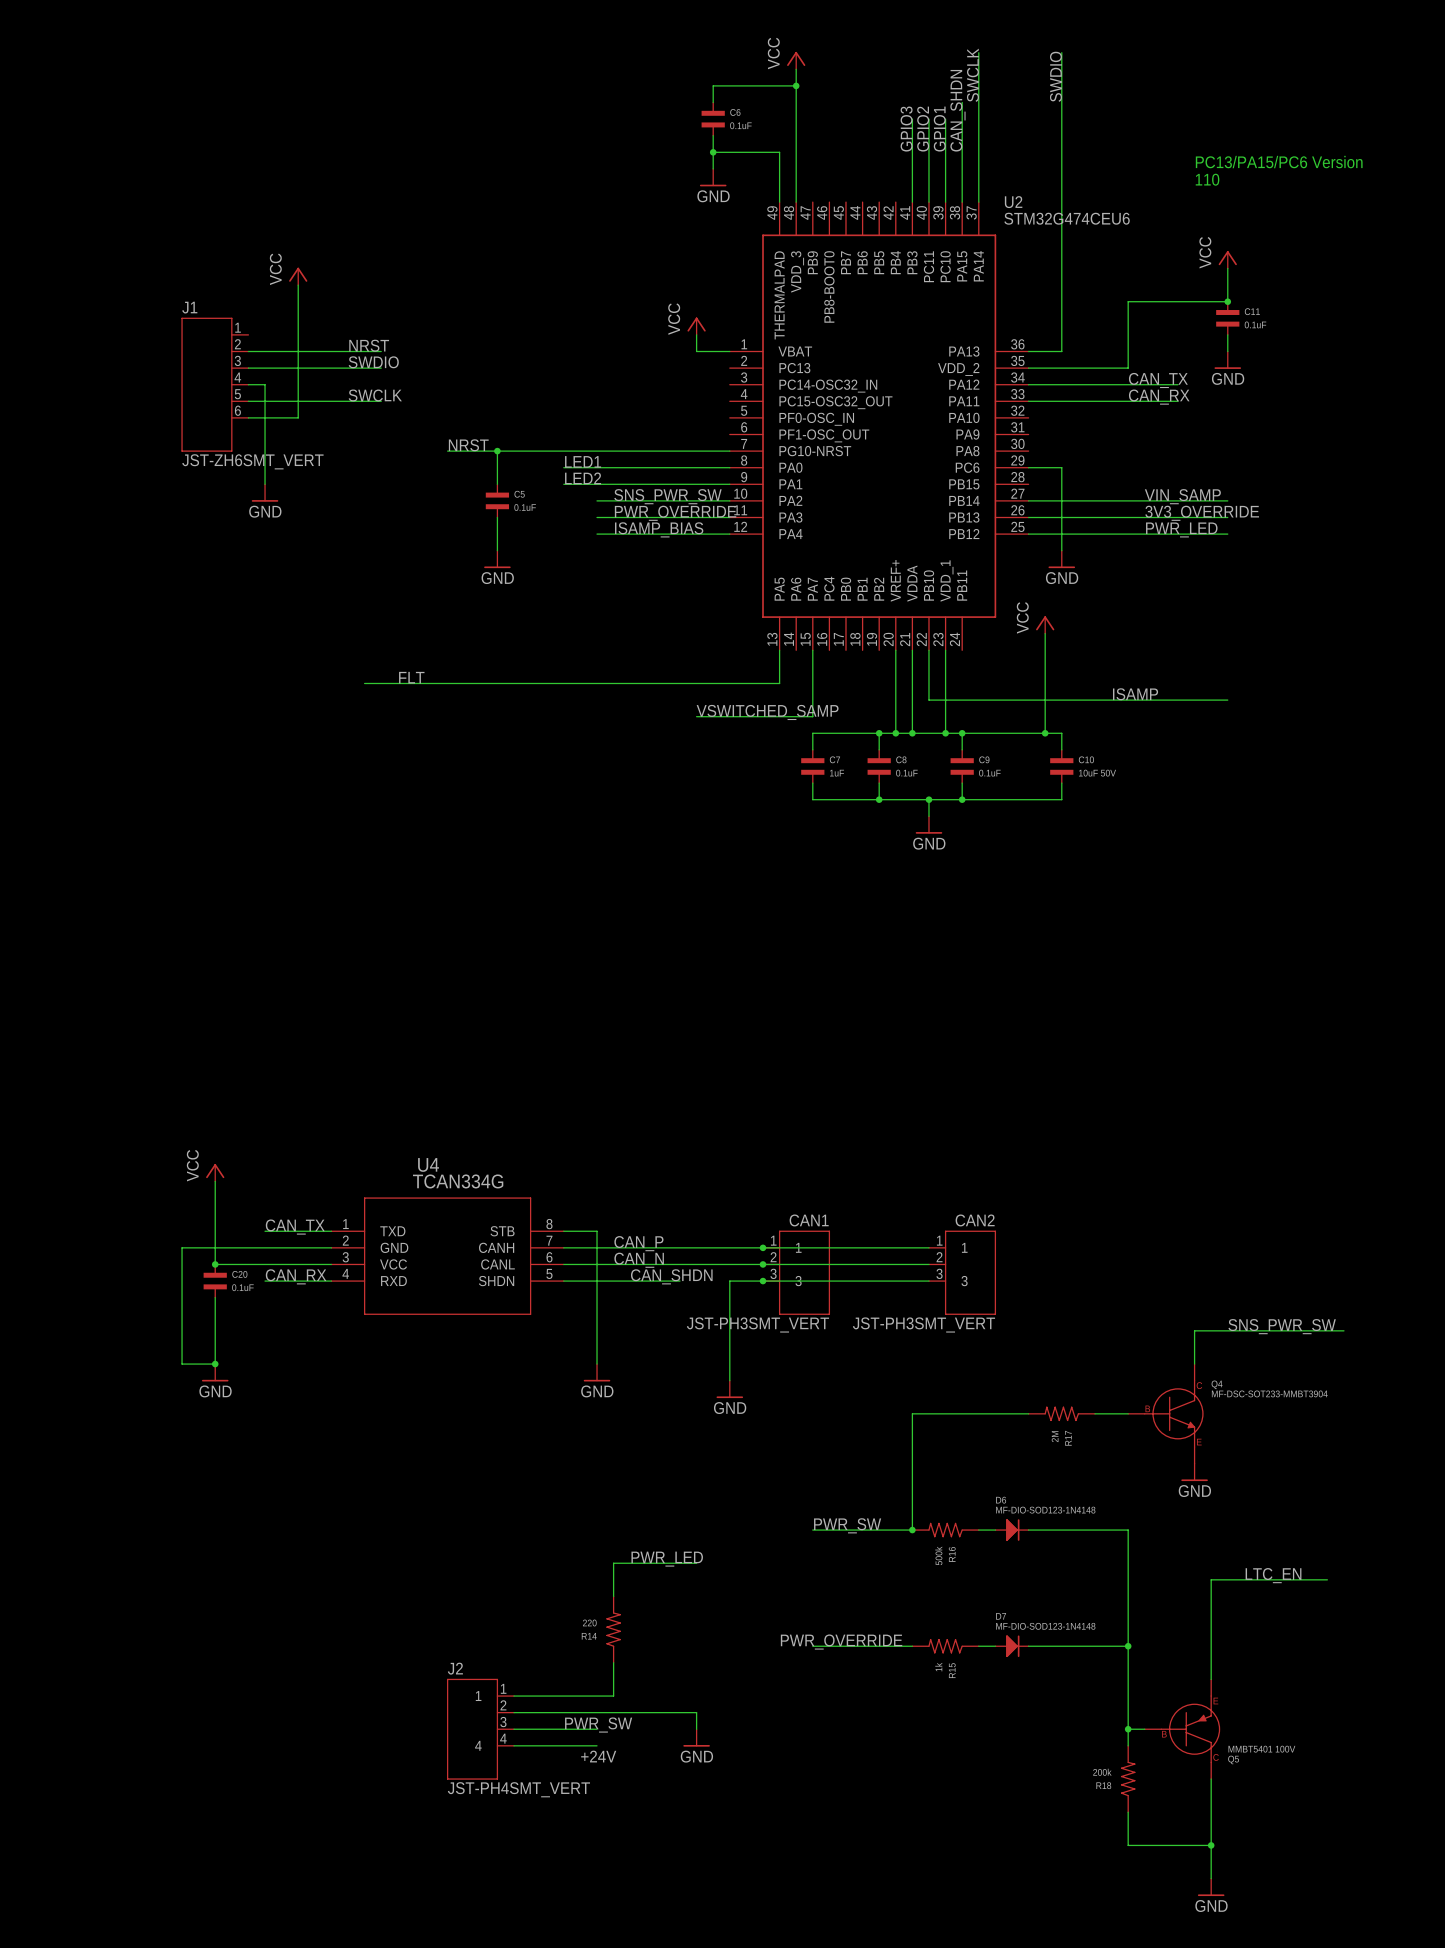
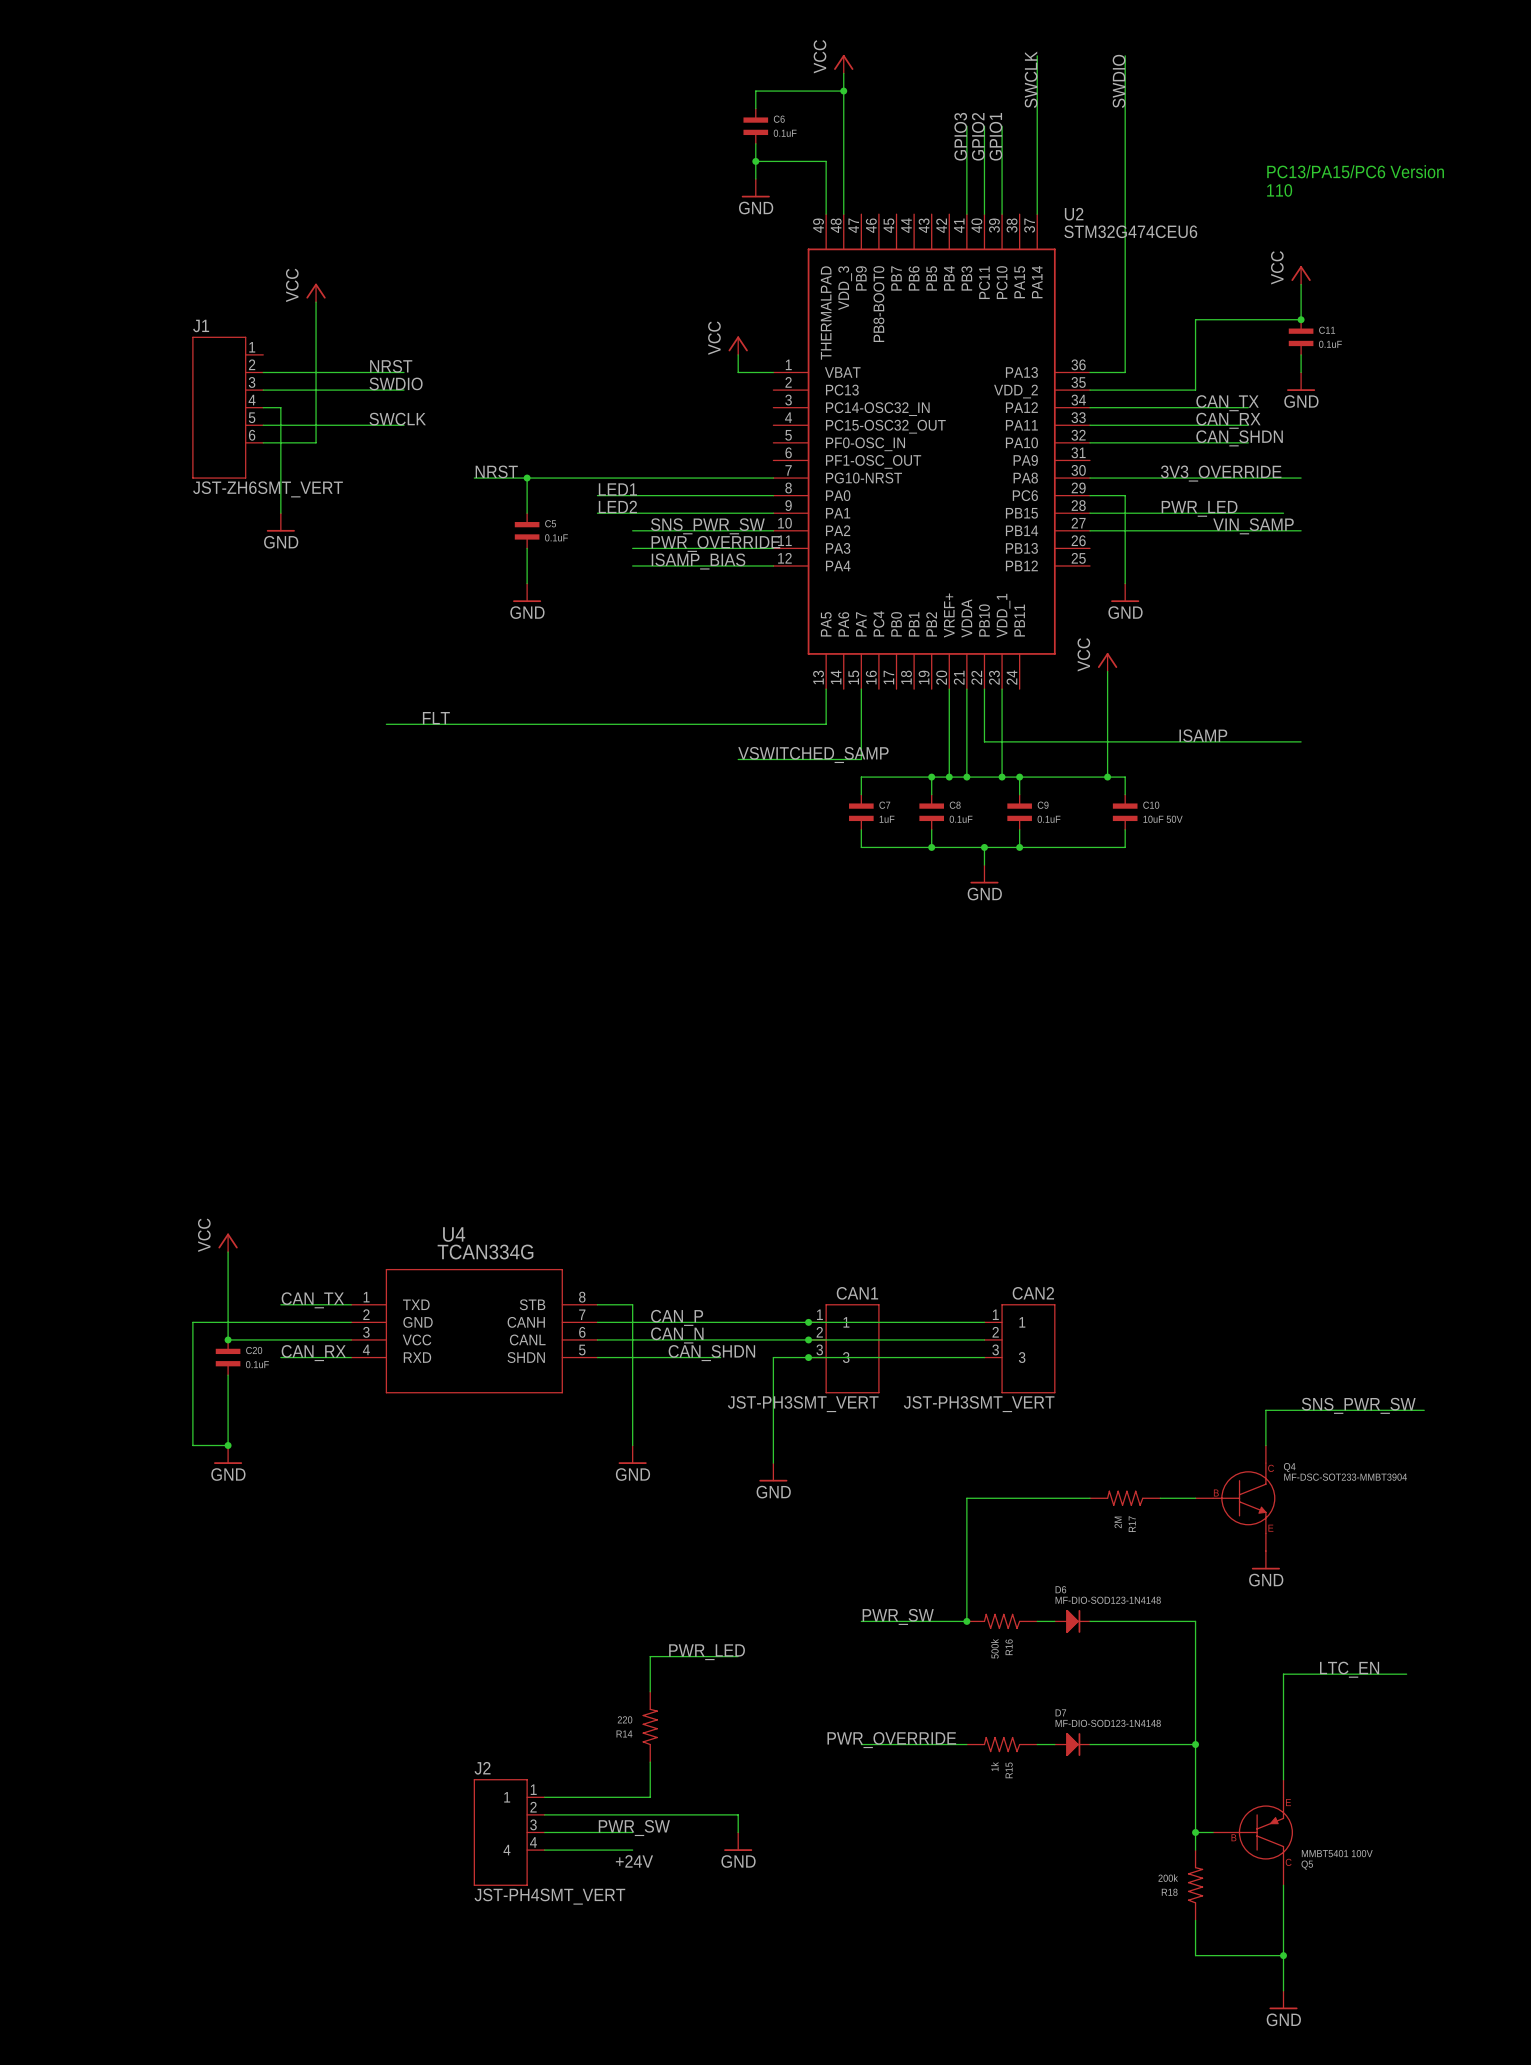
wire: (962, 102) (962, 202) -> none
label: CAN_SHDN (957, 110) -> none
label: none -> CAN_SHDN (1239, 438)
wire: none -> (1090, 442) (1248, 442)
wire: none -> (1090, 513) (1283, 513)
label position: 3V3_OVERRIDE (1202, 513) -> 3V3_OVERRIDE (1221, 473)
wire: (1028, 517) (1227, 517) -> (1090, 478) (1301, 478)
label position: PWR_LED (1181, 529) -> PWR_LED (1199, 508)
wire: (1028, 534) (1227, 534) -> none

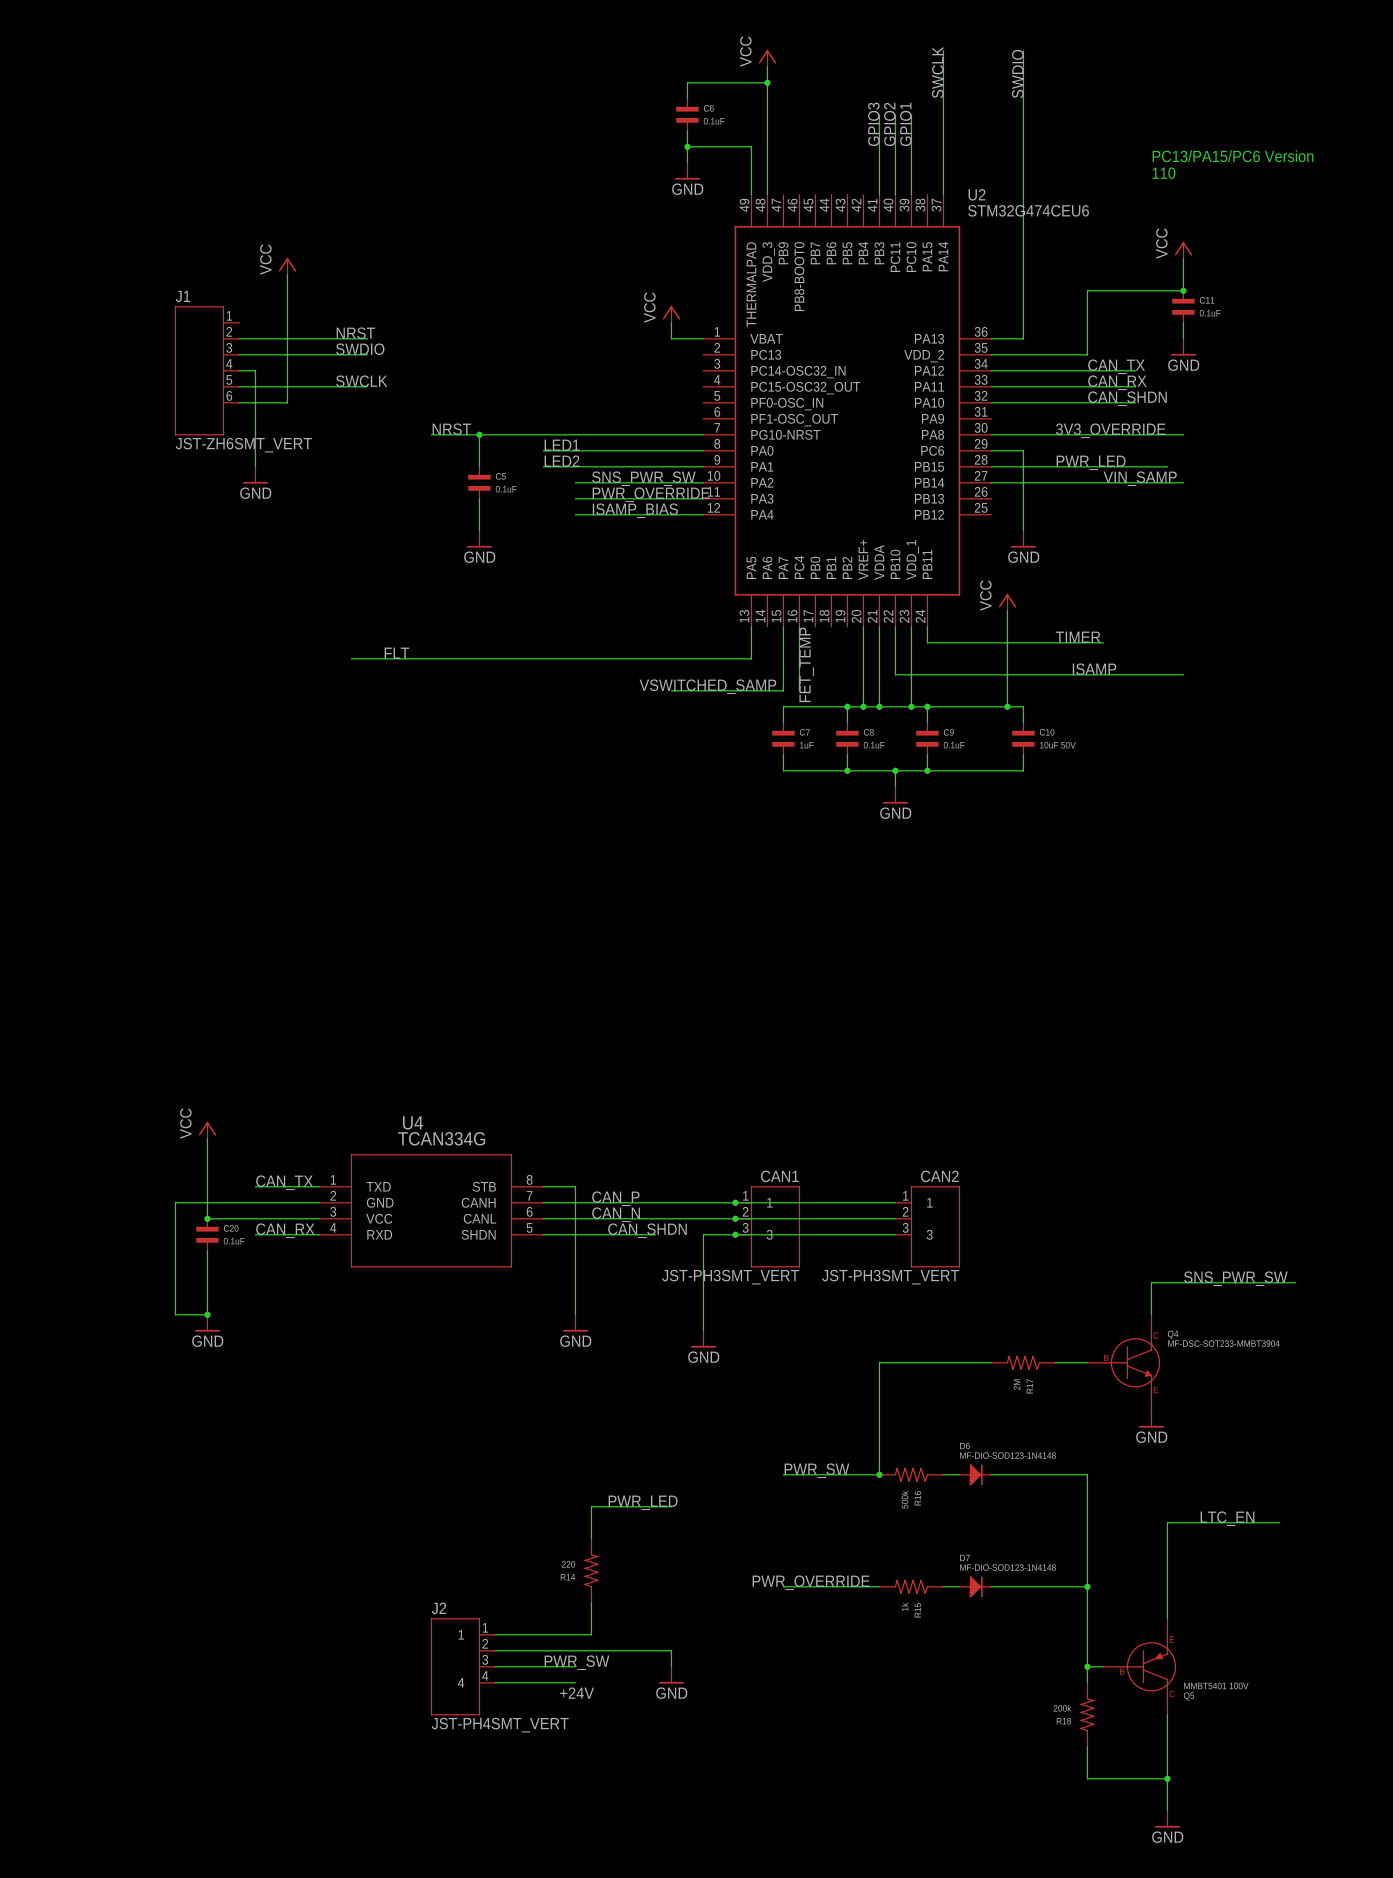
wire: none -> (799, 626) (799, 690)
wire: none -> (927, 626) (927, 642) (1103, 642)
label: none -> TIMER (1078, 637)
label: none -> FET_TEMP (806, 664)
label position: VSWITCHED_SAMP (813, 755) -> VSWITCHED_SAMP (707, 686)

